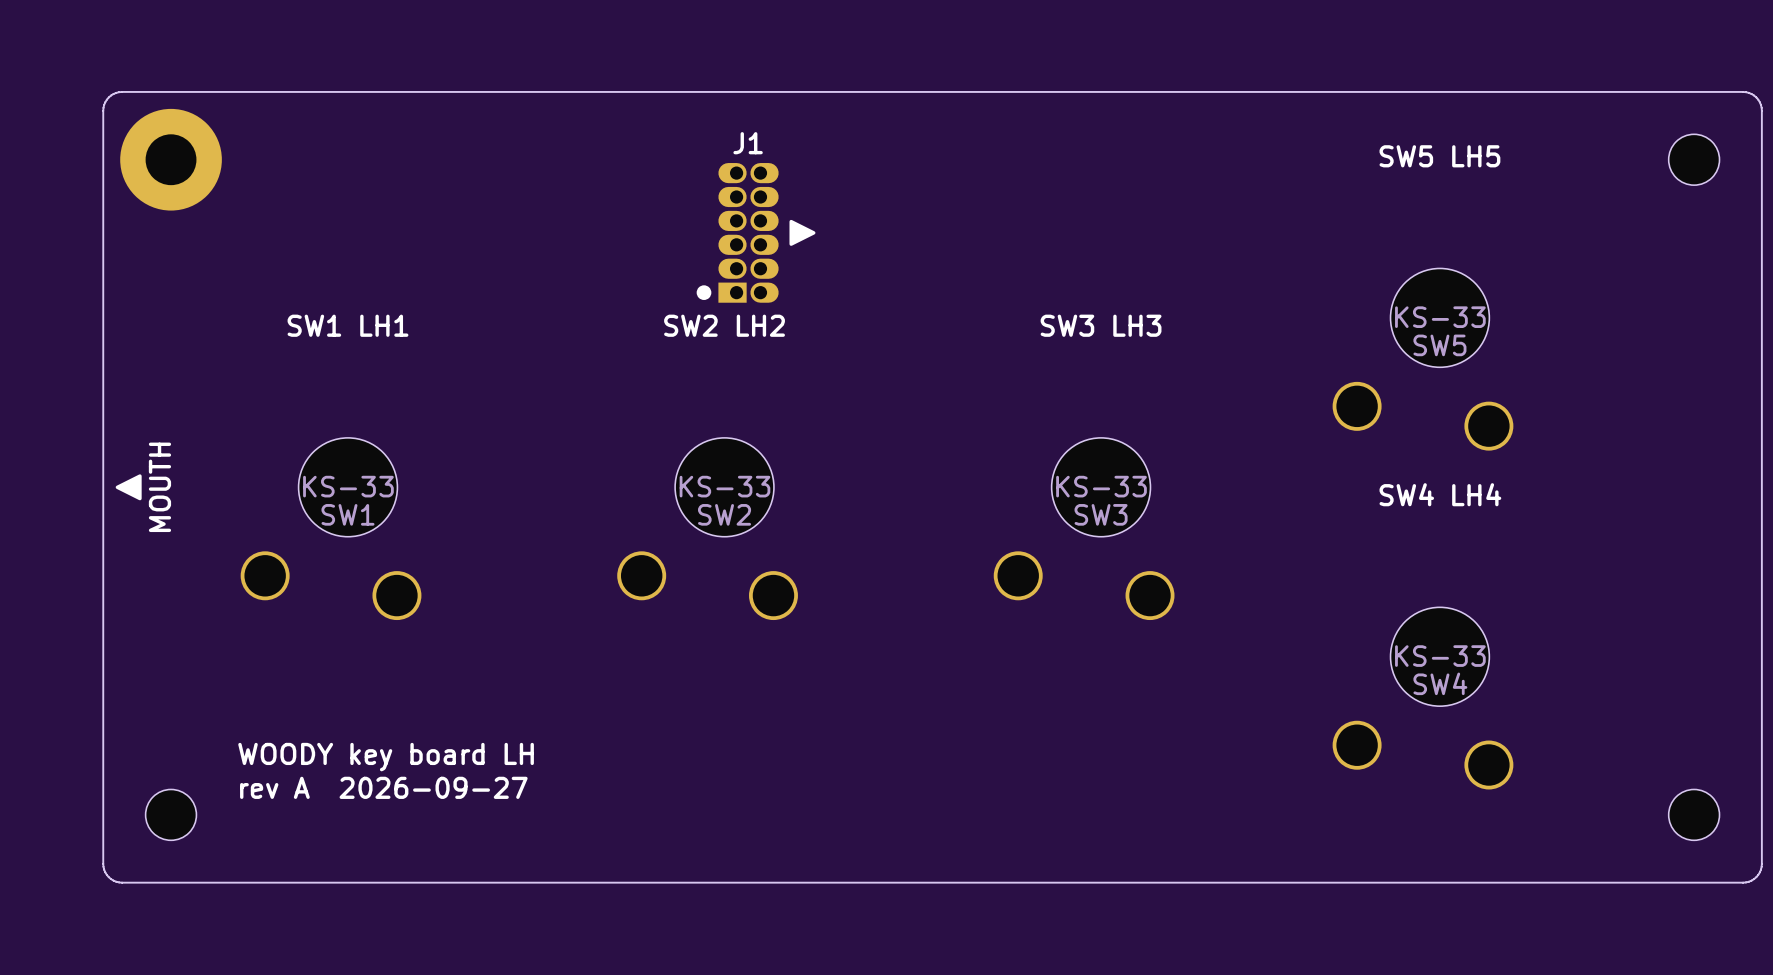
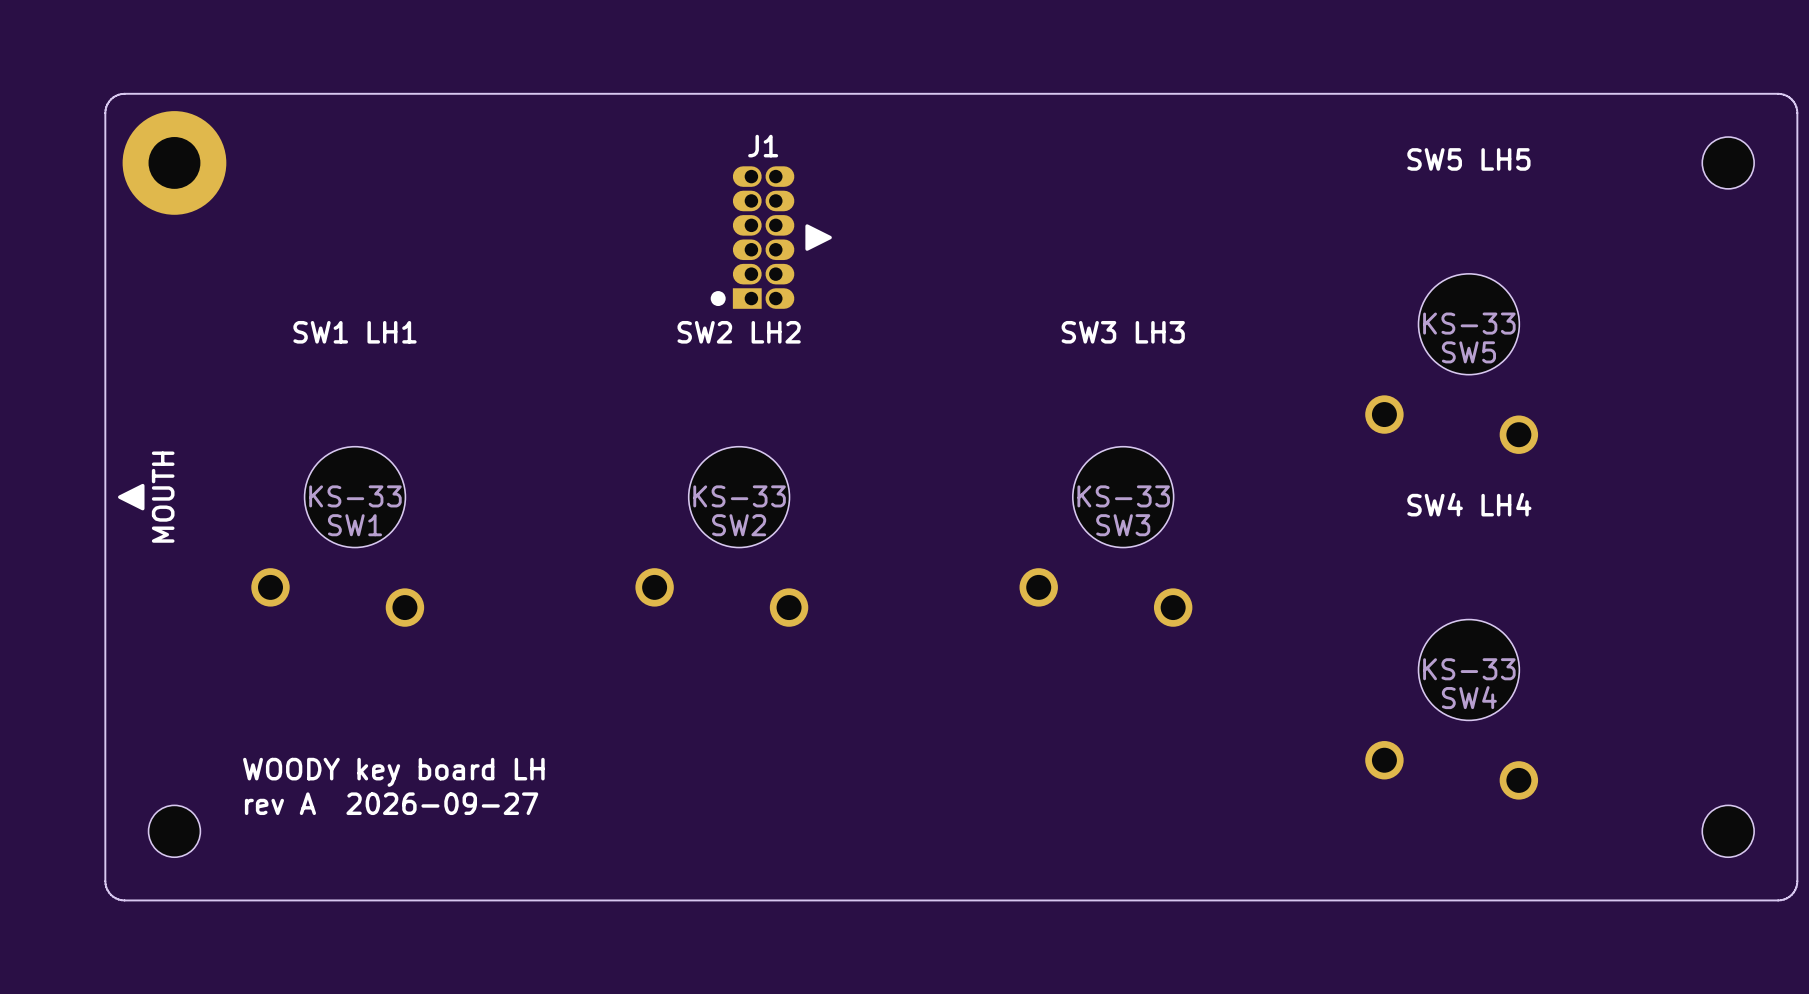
SW5 footprint: [1332, 268, 1514, 451] -> [1365, 273, 1539, 454]
SW1 footprint: [240, 437, 422, 621] -> [251, 446, 425, 627]
SW2 footprint: [617, 437, 798, 621] -> [635, 446, 809, 627]
SW3 footprint: [993, 437, 1175, 621] -> [1019, 446, 1193, 627]
SW4 footprint: [1332, 607, 1514, 790] -> [1365, 619, 1539, 800]

